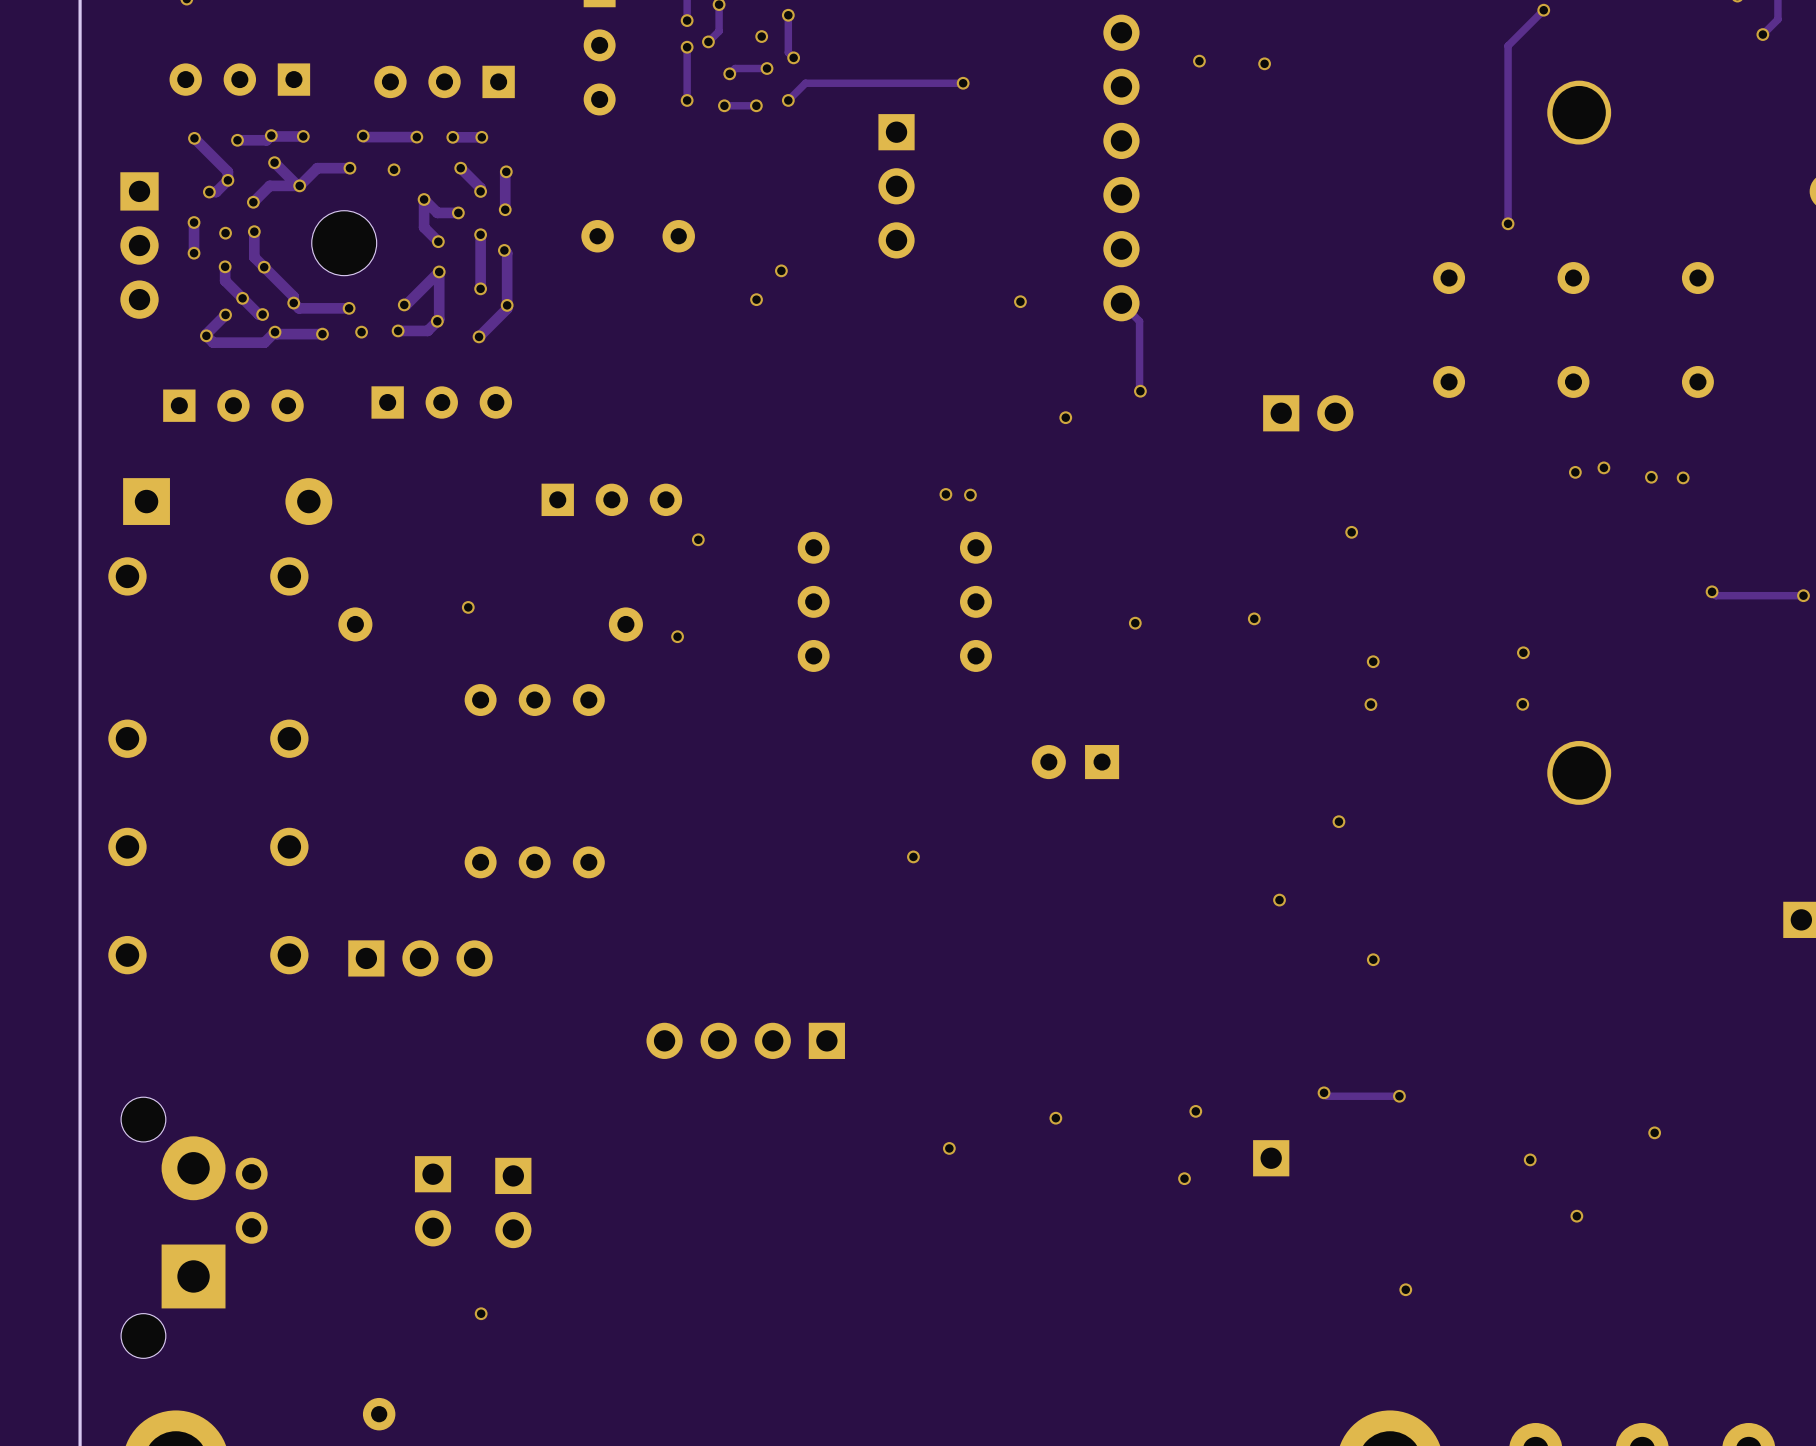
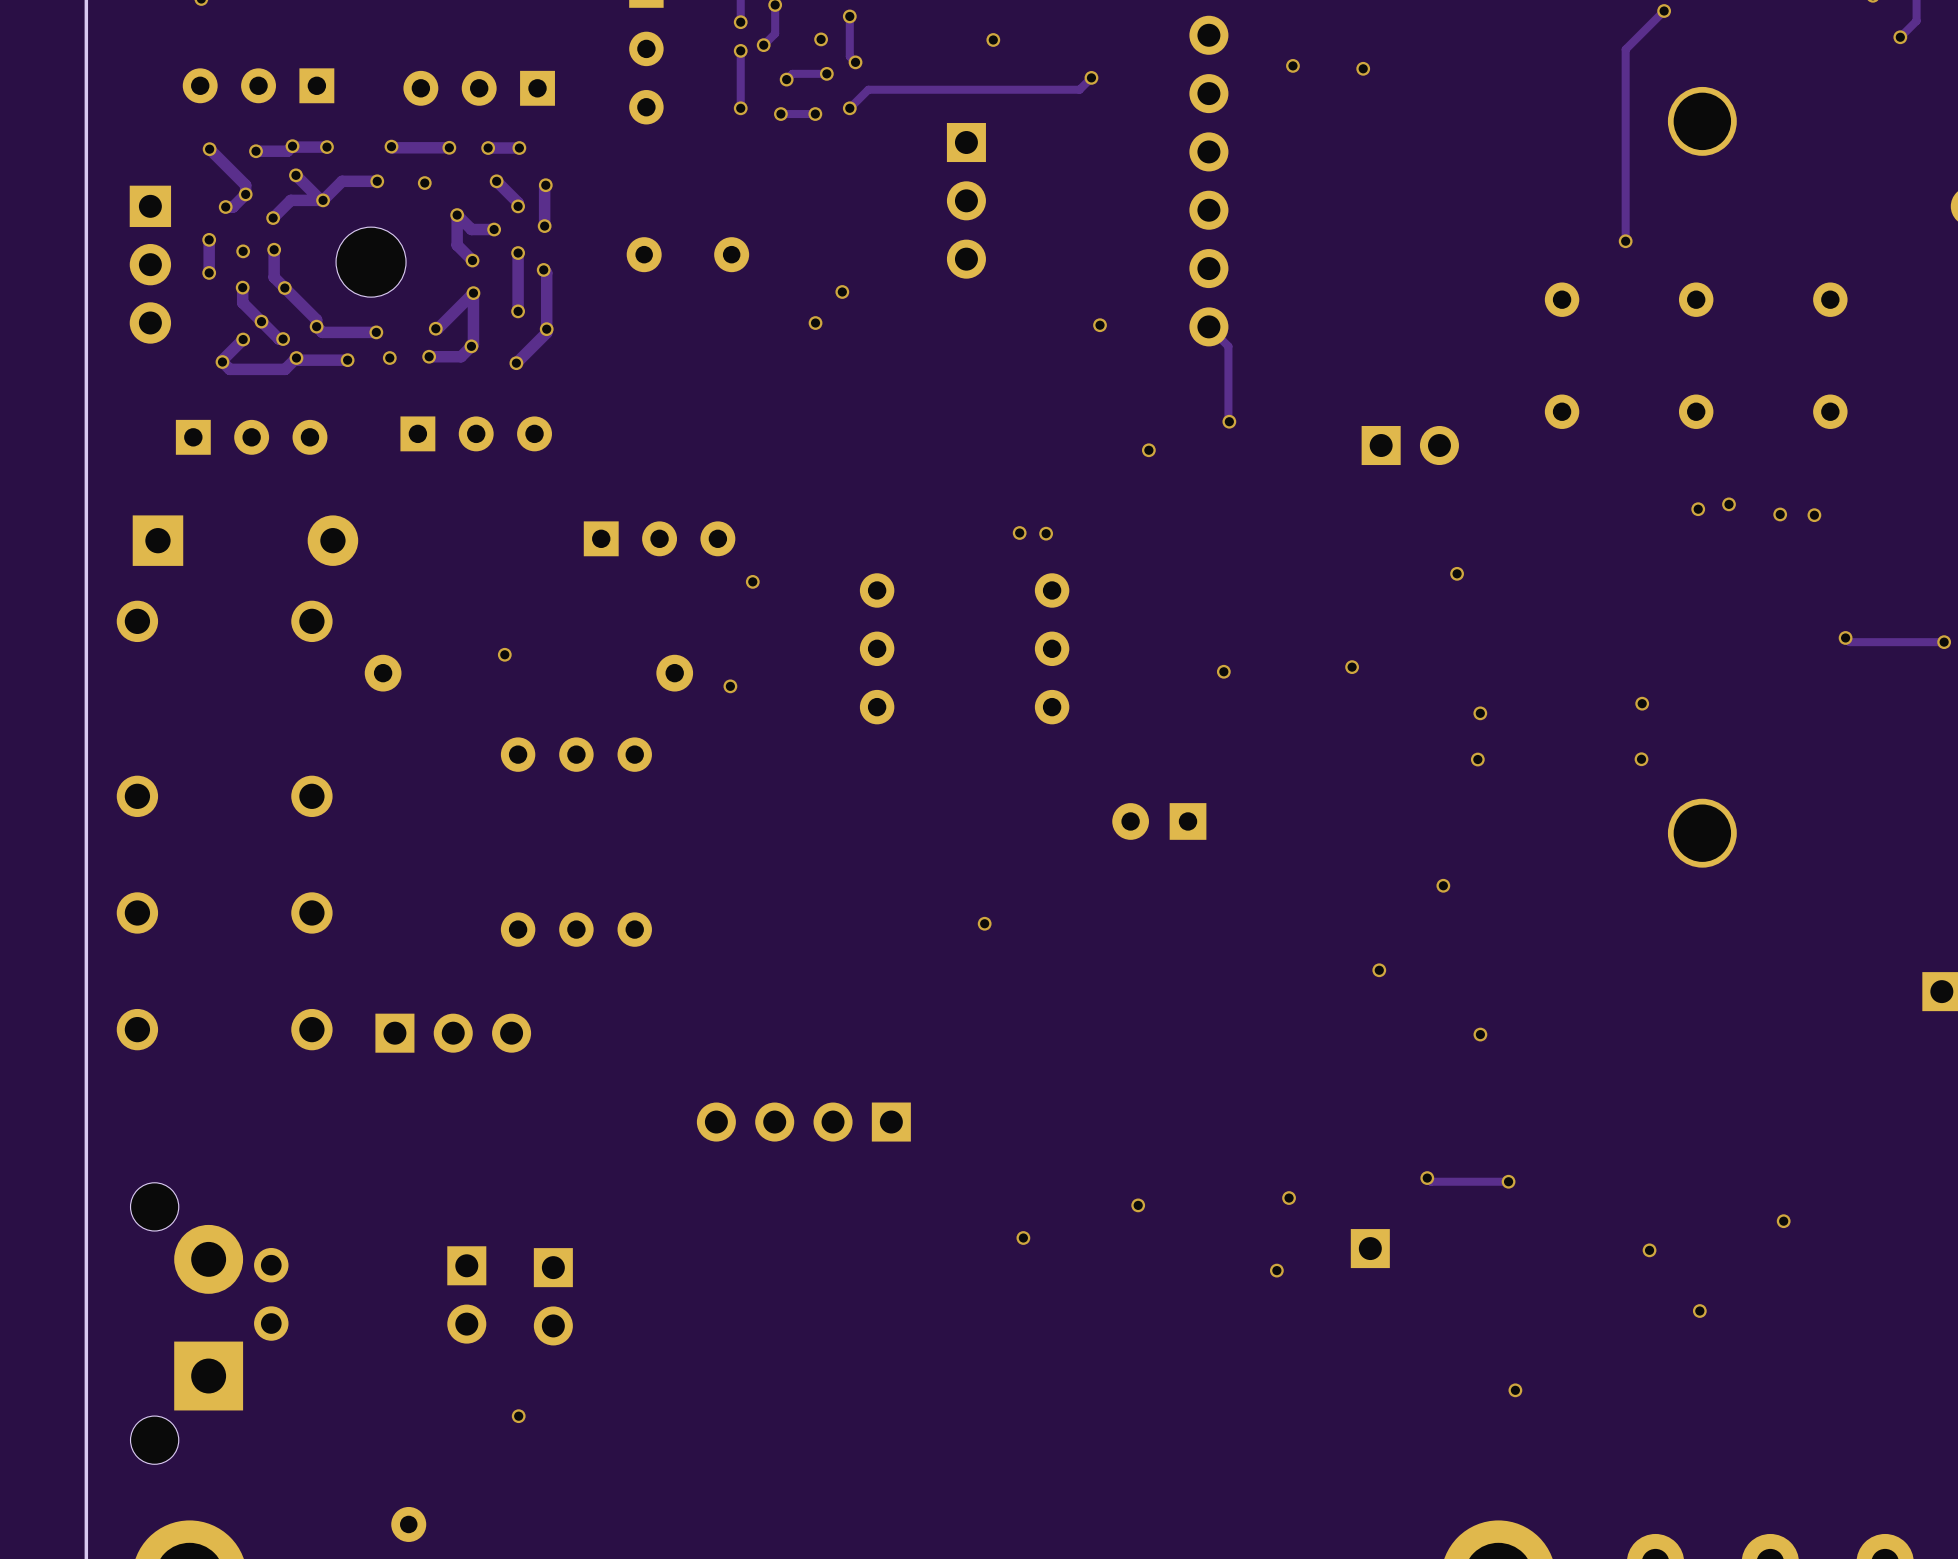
via: none -> (993, 39)
track: none -> (1091, 77) (1079, 89) (1038, 89)
via: none -> (1091, 77)
via: (963, 83) -> none

